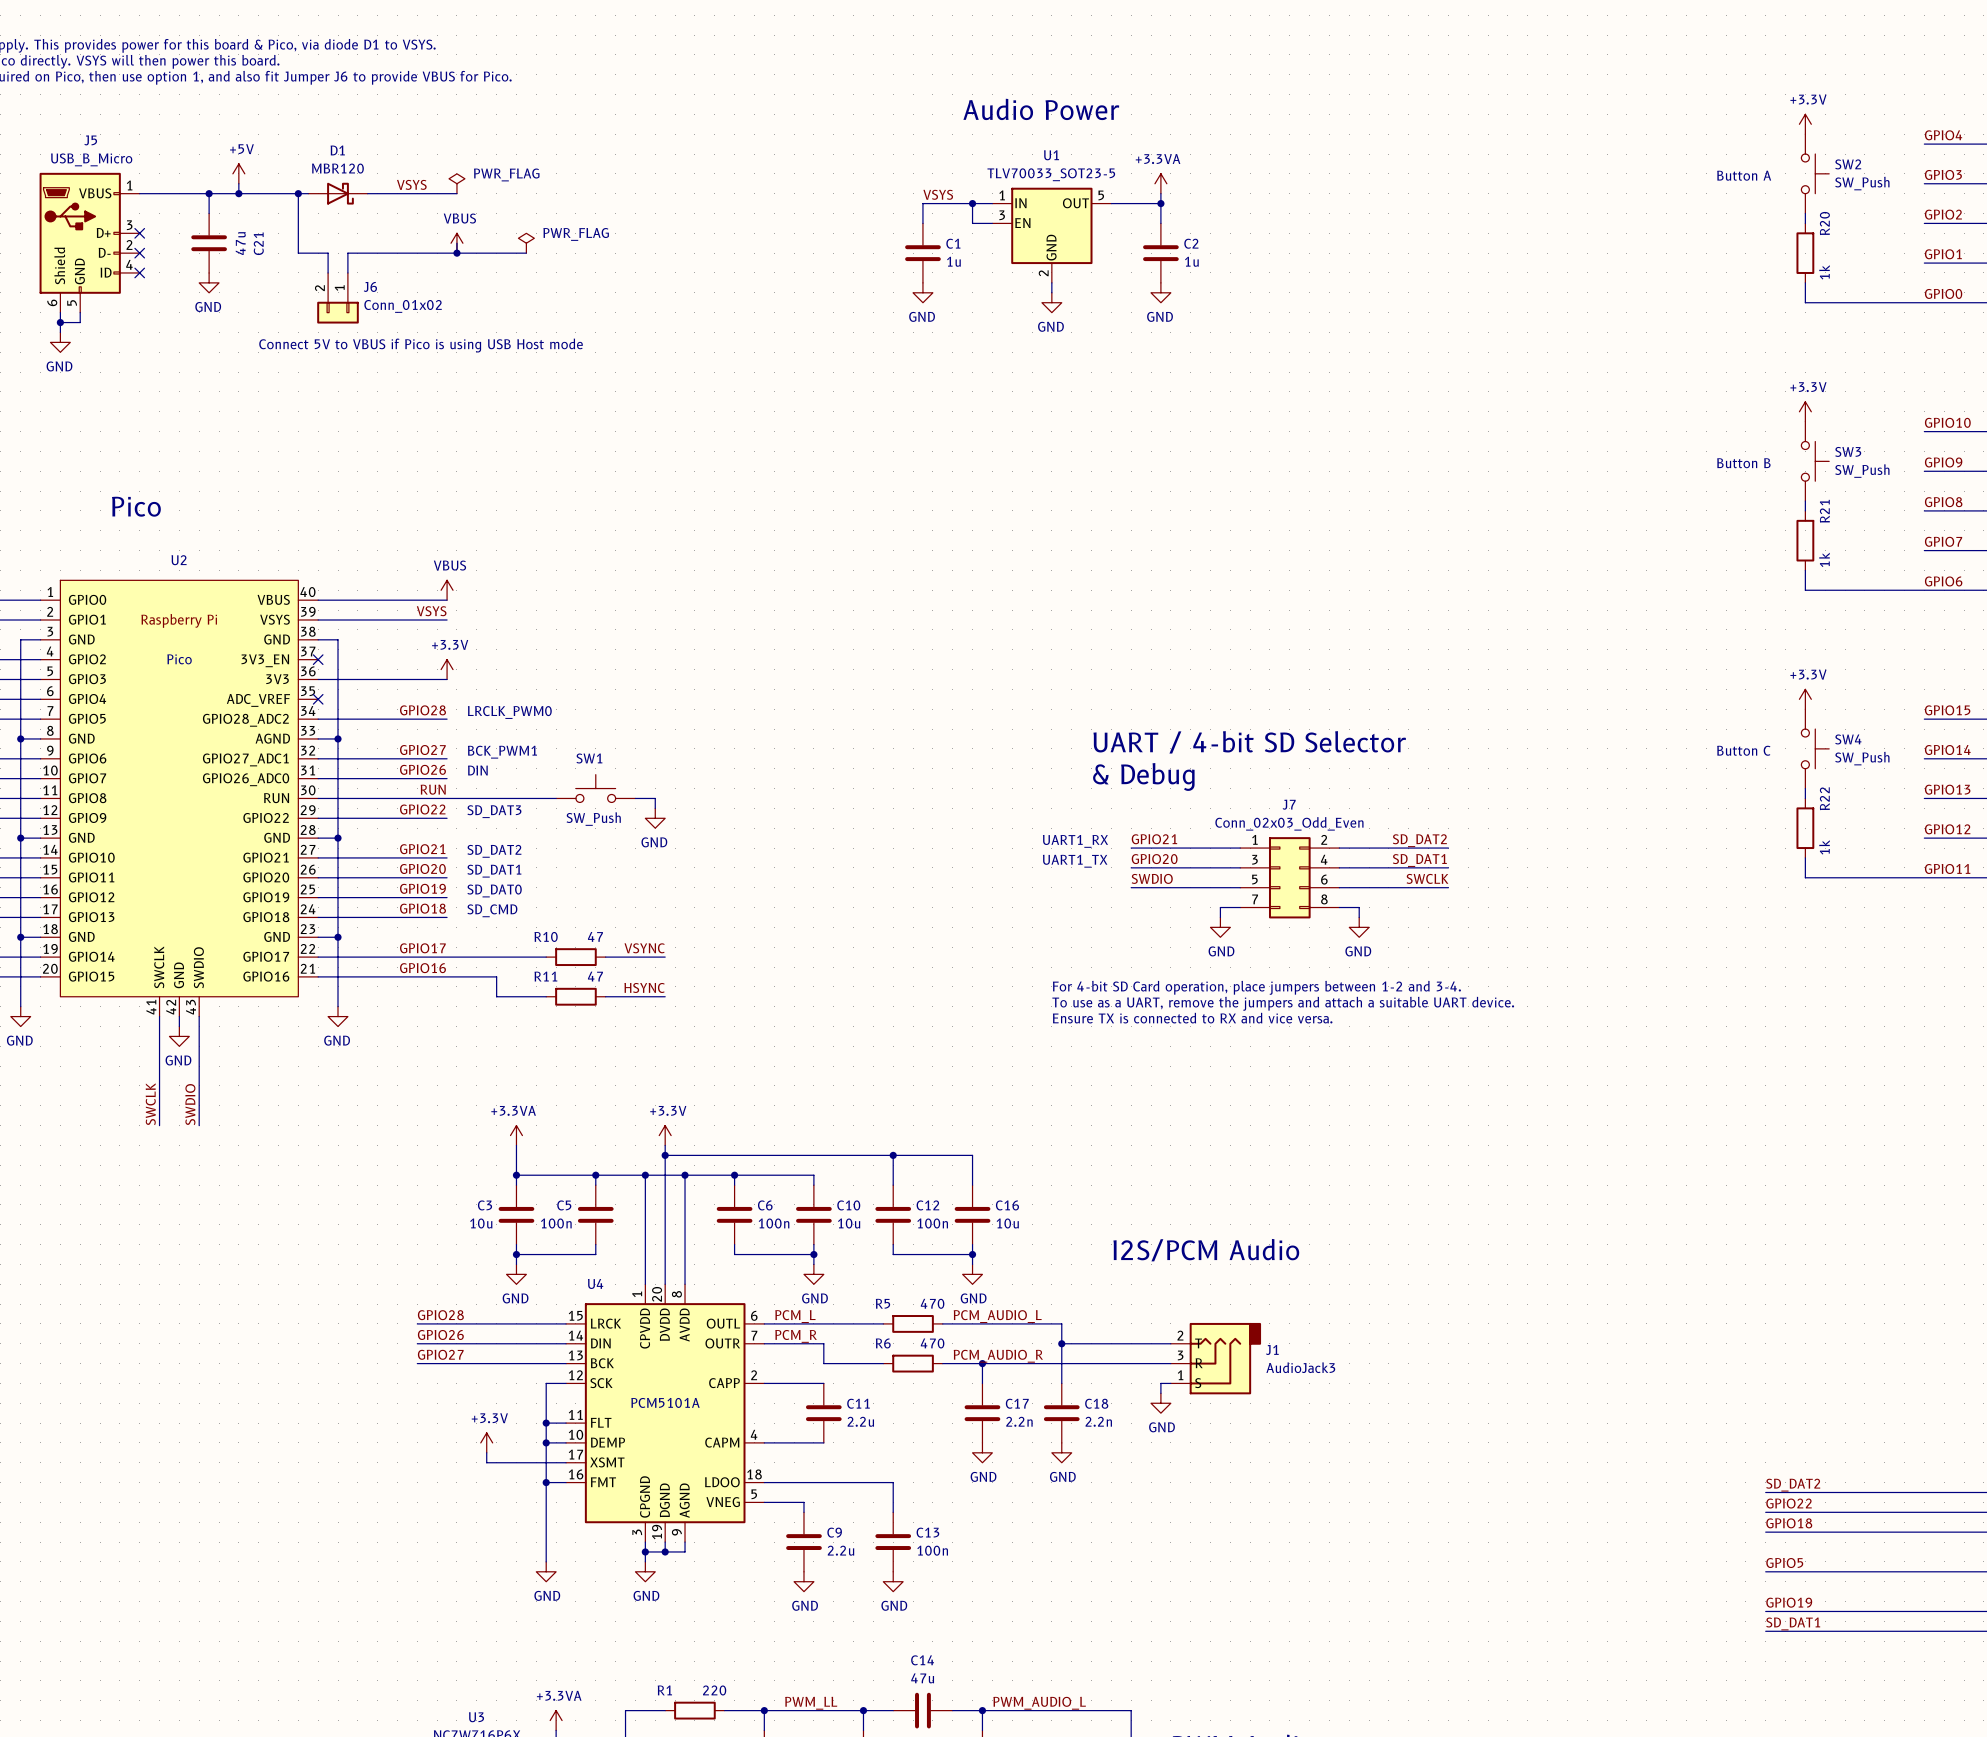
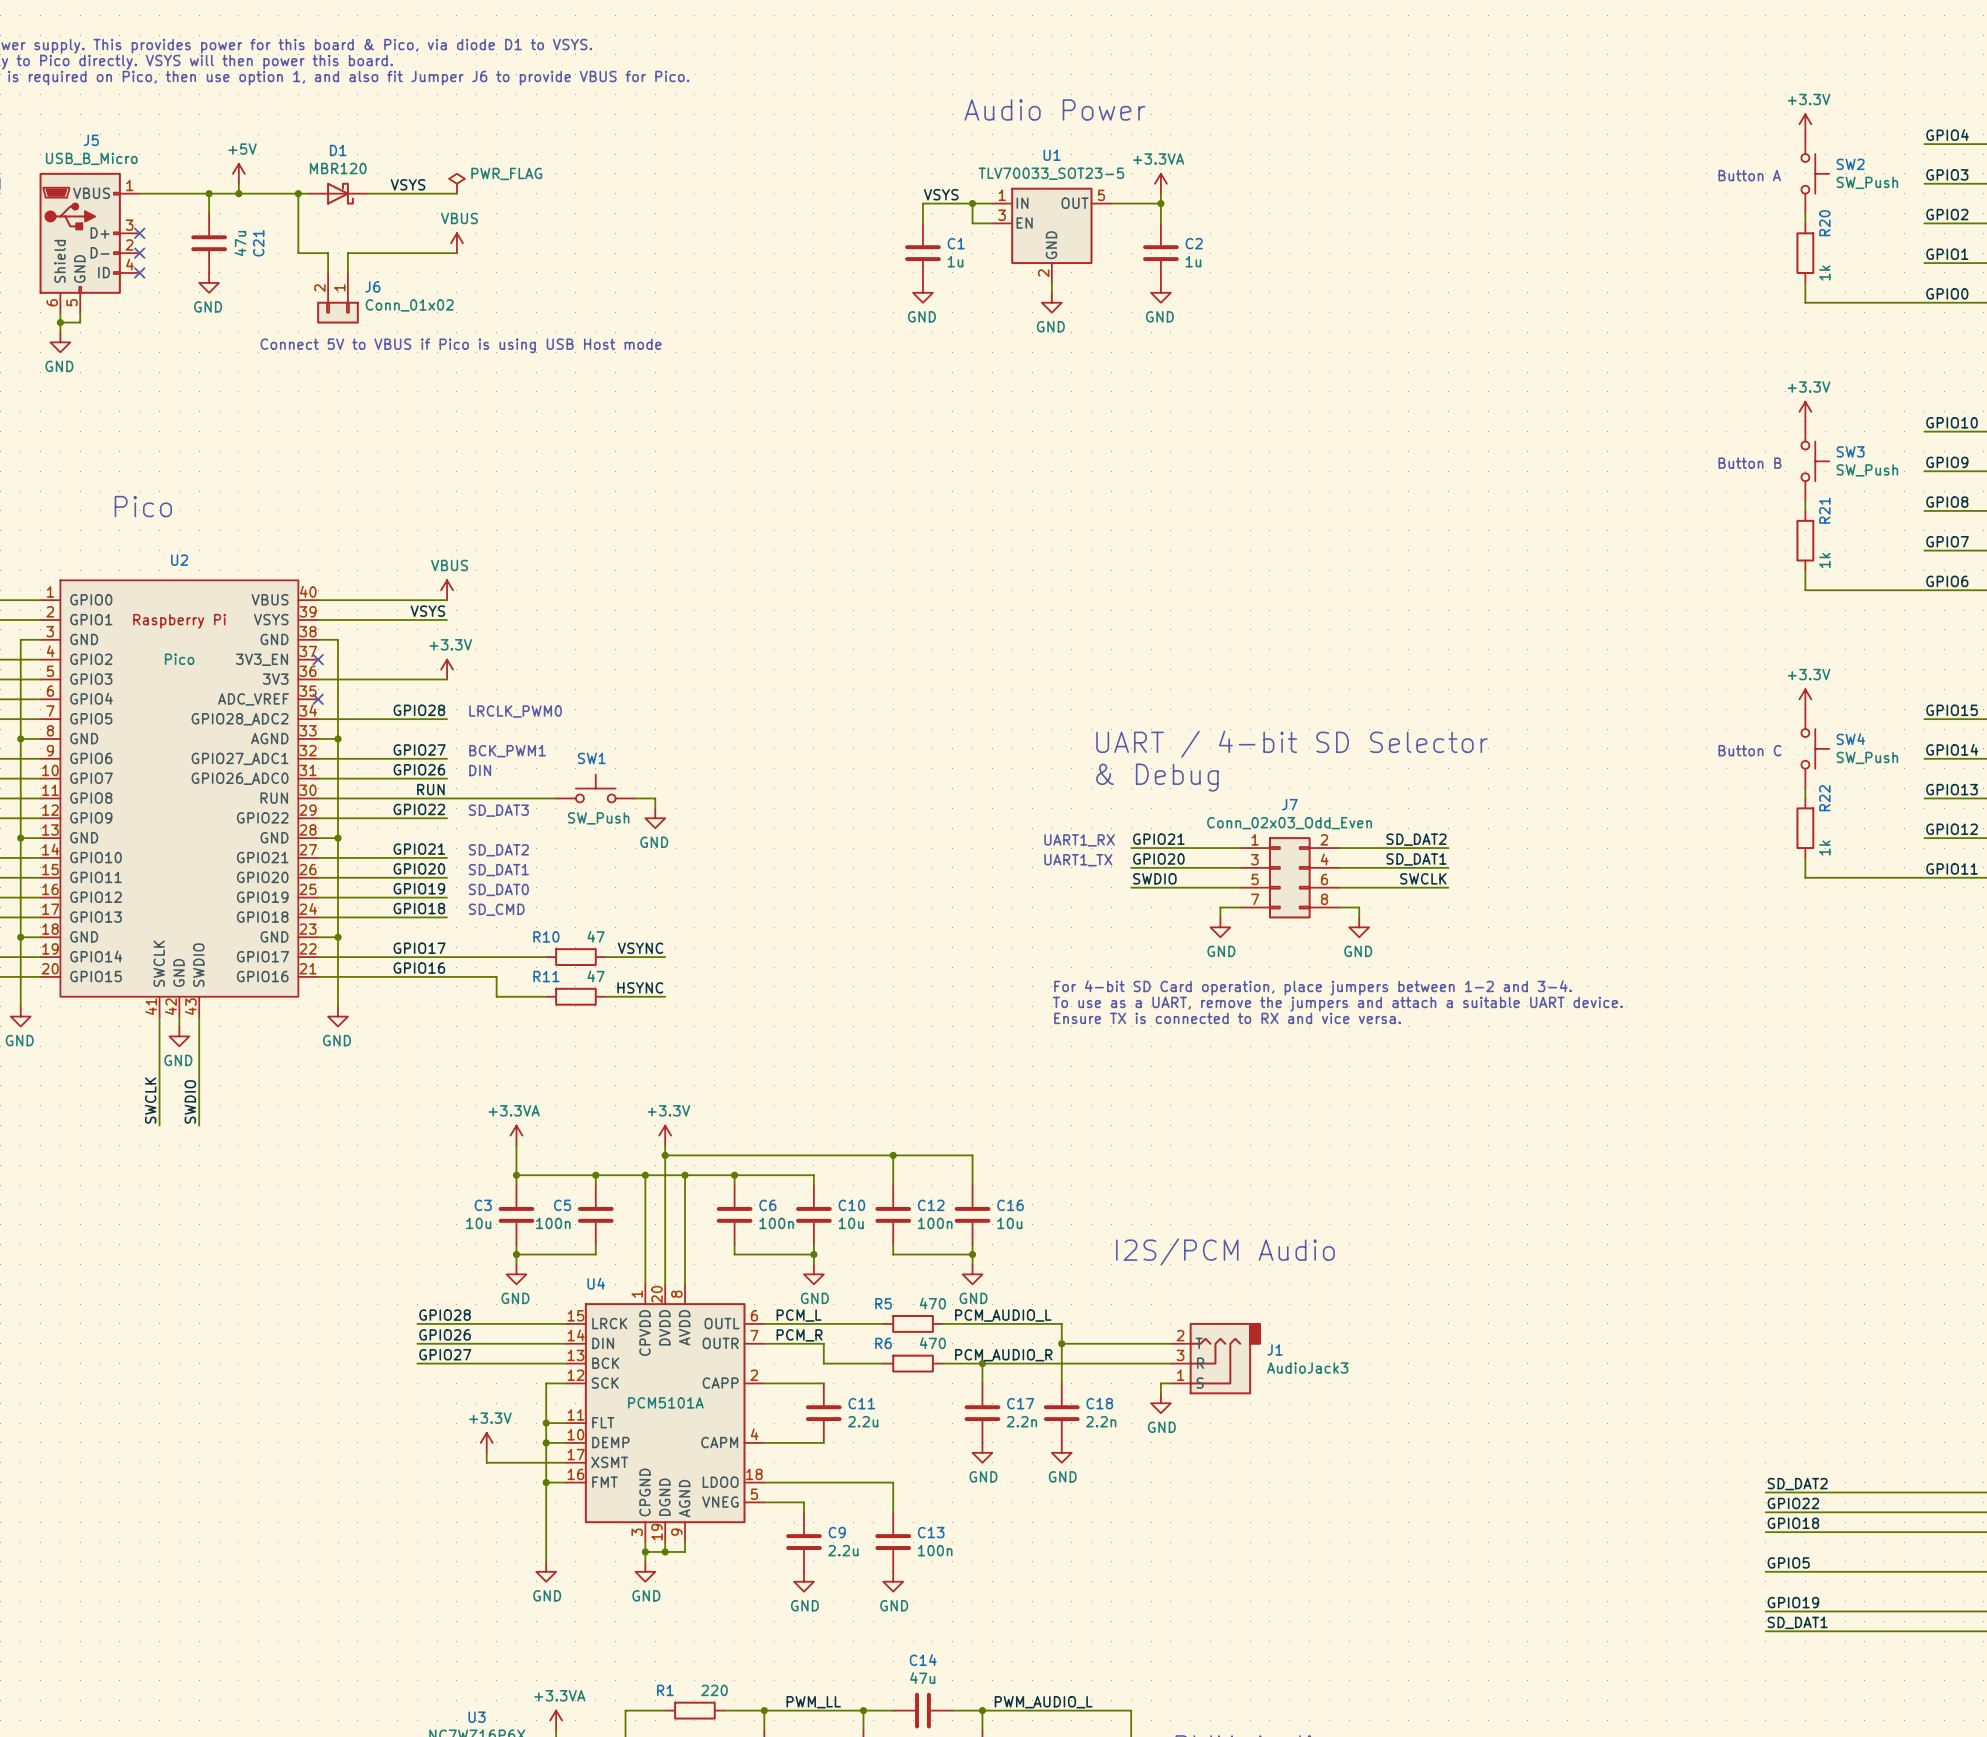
wire: (456, 243) (456, 253) (526, 253) -> none
power symbol: PWR_FLAG (526, 243) -> none
junction: (456, 253) -> none

